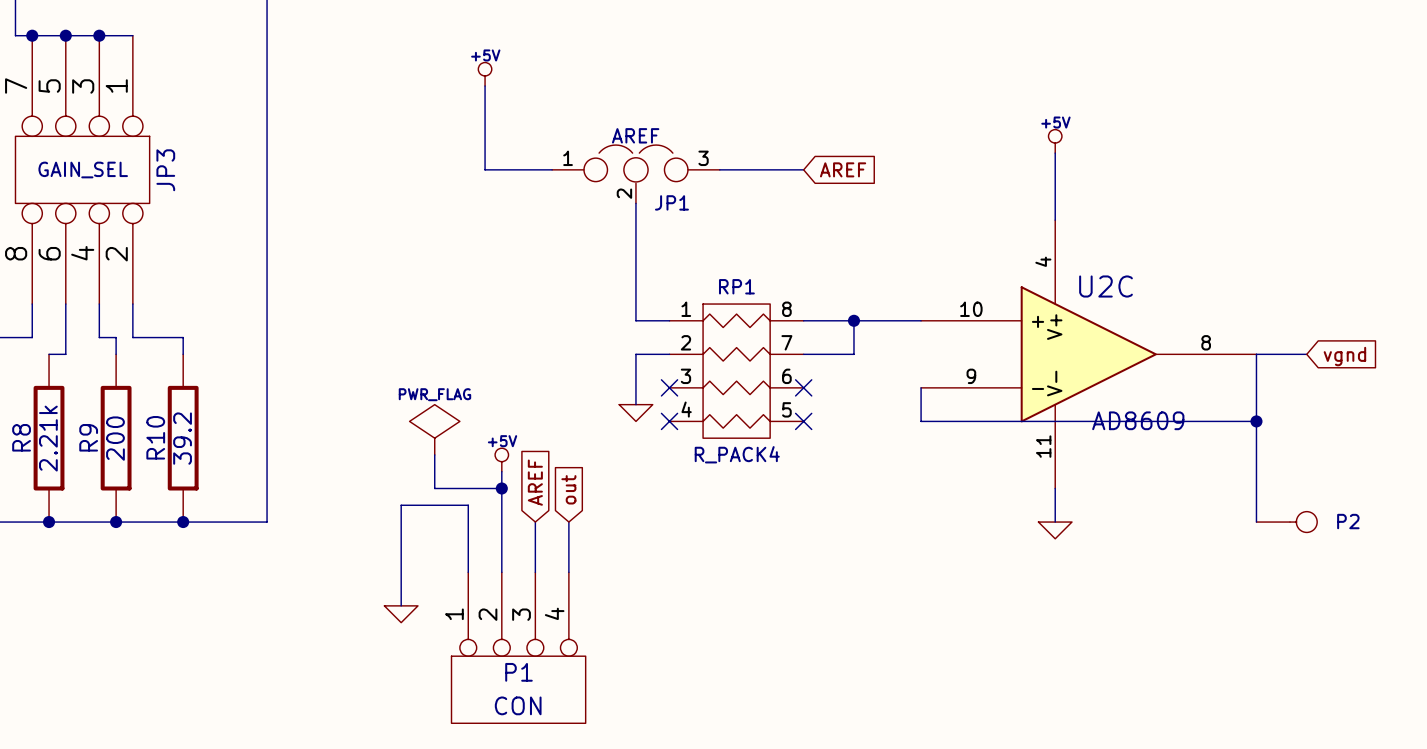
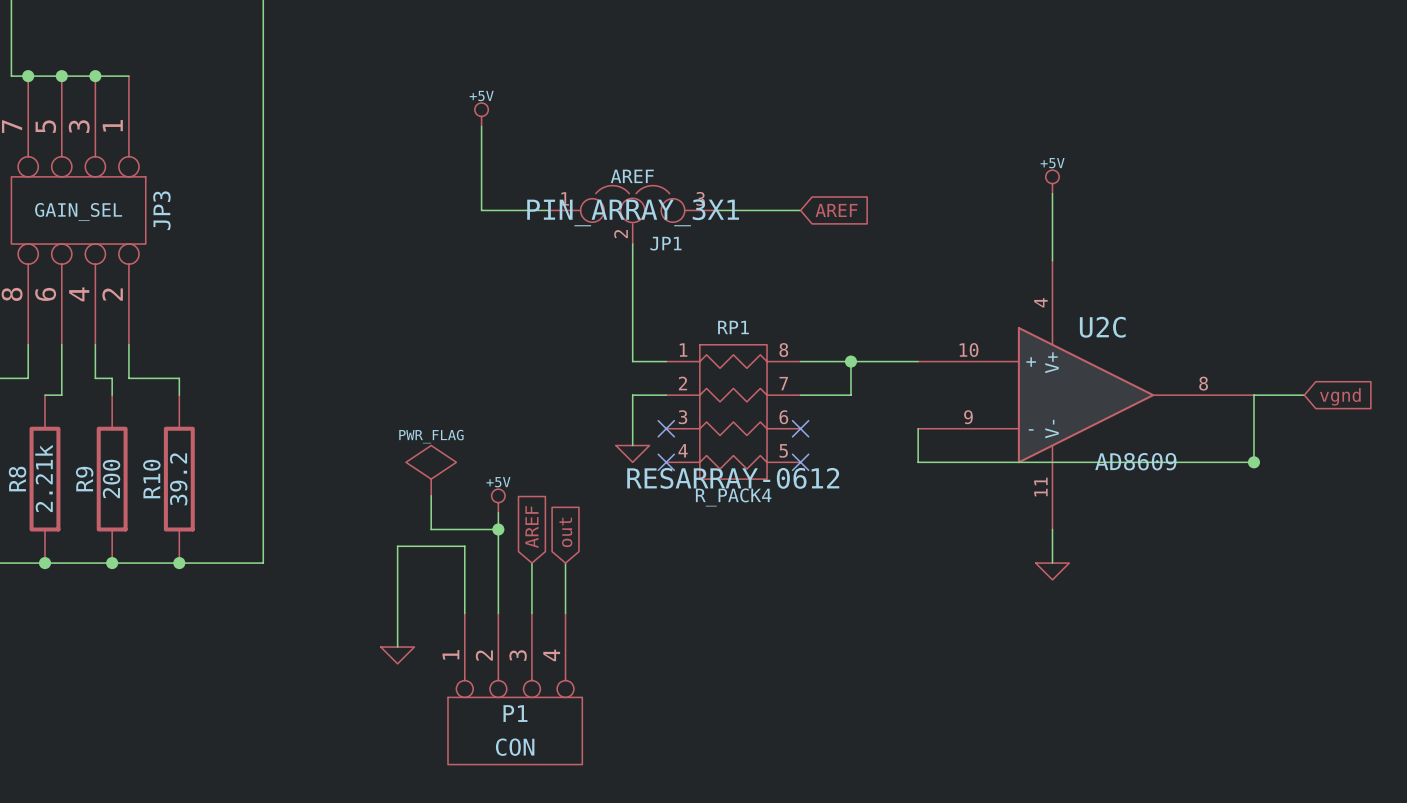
JP1 text: none -> PIN_ARRAY_3X1 (633, 212)
wire: (1256, 421) (1256, 522) -> none
RP1 text: none -> RESARRAY-0612 (733, 478)
P2: (1286, 522) -> none

